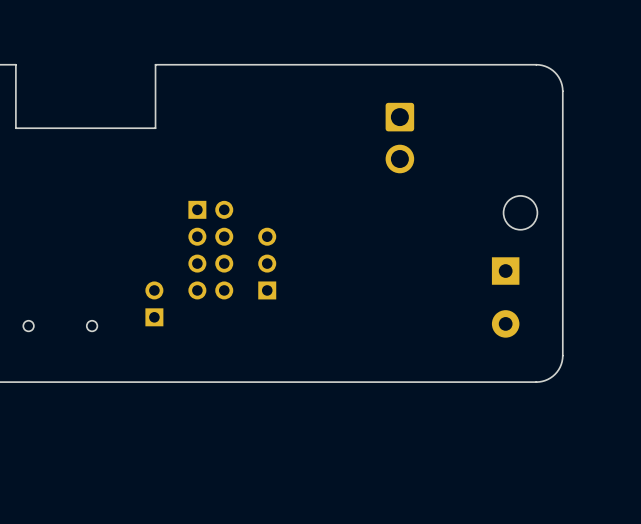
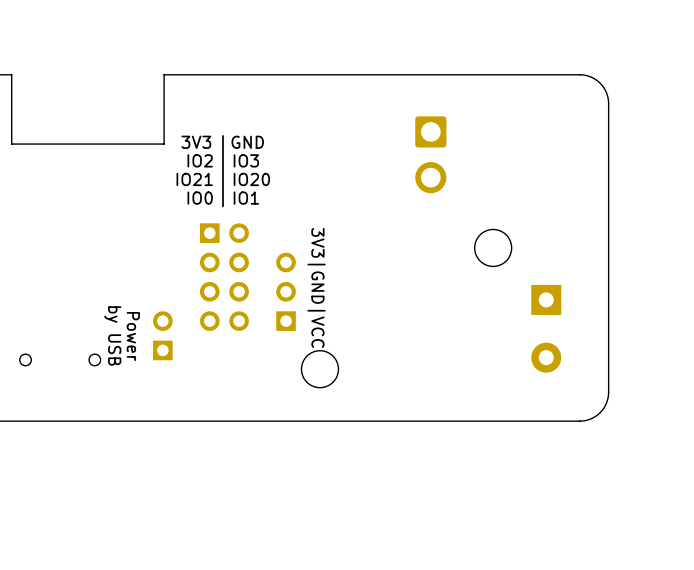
line: none -> (222, 135) (222, 206)
text: none -> 3V3 GND (222, 142)
text: none -> IO2 IO3 (223, 160)
text: none -> IO21 IO20 (223, 179)
text: none -> IO0 IO1 (223, 198)
round board edge position: (520, 212) -> (493, 247)
text: none -> 3V3|GND|VCC (316, 287)
text: none -> by USB (112, 335)
text: none -> Power (133, 336)
round board edge: none -> [301, 350, 339, 388]

